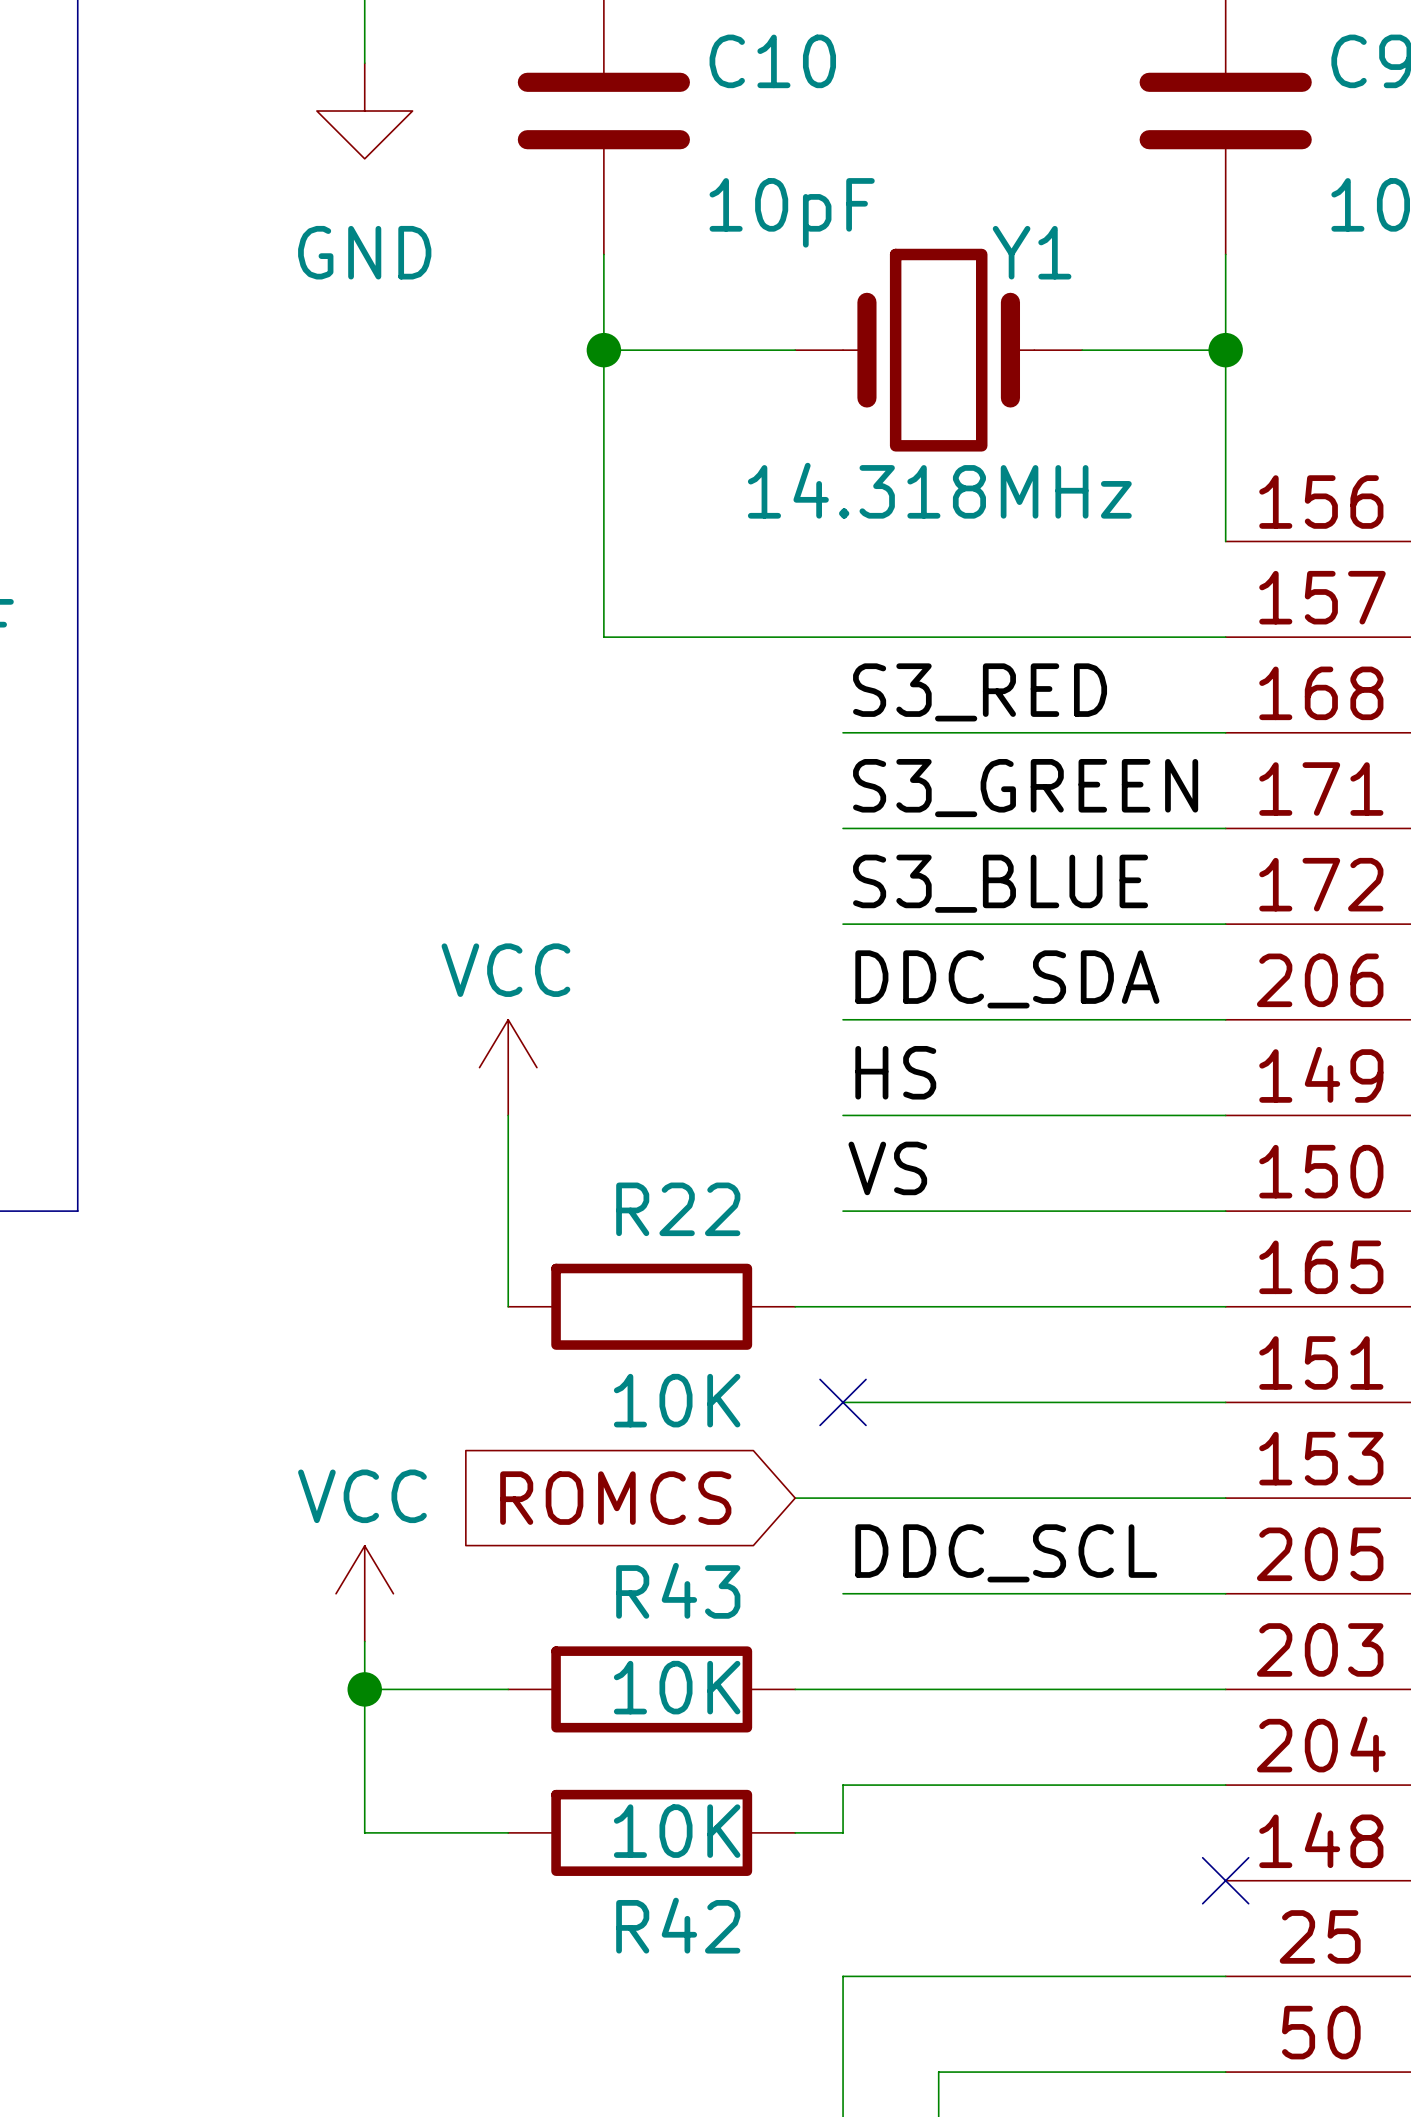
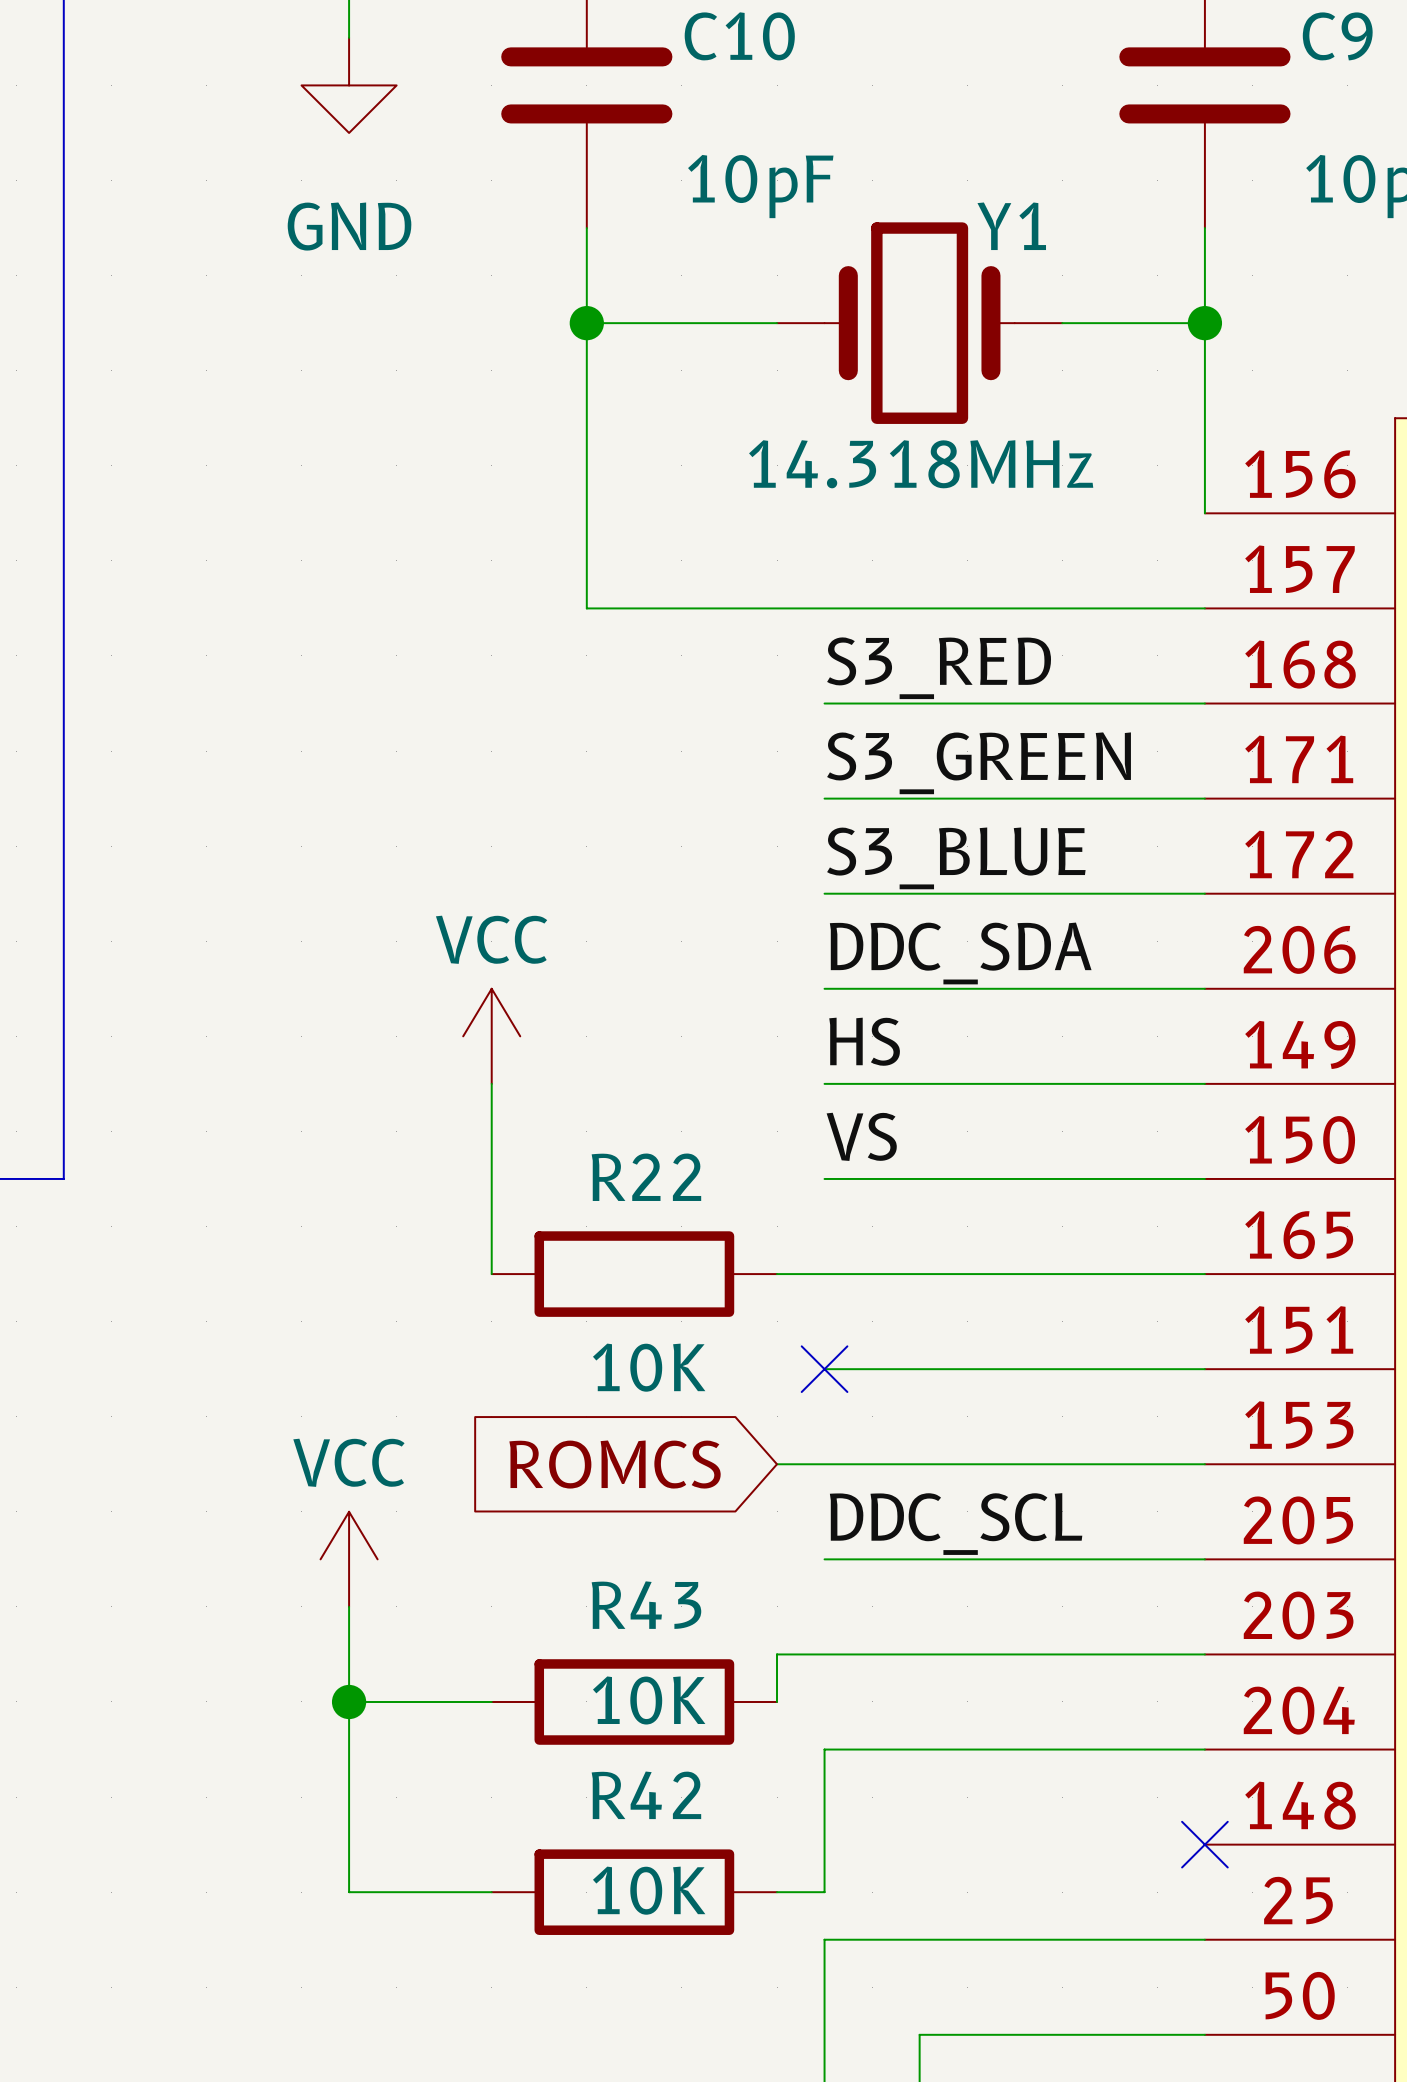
wire: (364, 1689) (508, 1689) -> (349, 1701) (491, 1701)
junction position: (364, 1689) -> (349, 1701)
R43 position: (651, 1689) -> (634, 1701)
wire: none -> (777, 1654) (777, 1701)
wire: (364, 1832) (508, 1832) -> (349, 1797) (349, 1892) (491, 1892)
R42 position: (651, 1832) -> (634, 1892)
wire: (795, 1832) (843, 1832) -> (777, 1892) (824, 1892) (824, 1797)
R42 name position: R42 (678, 1925) -> R42 (646, 1795)

